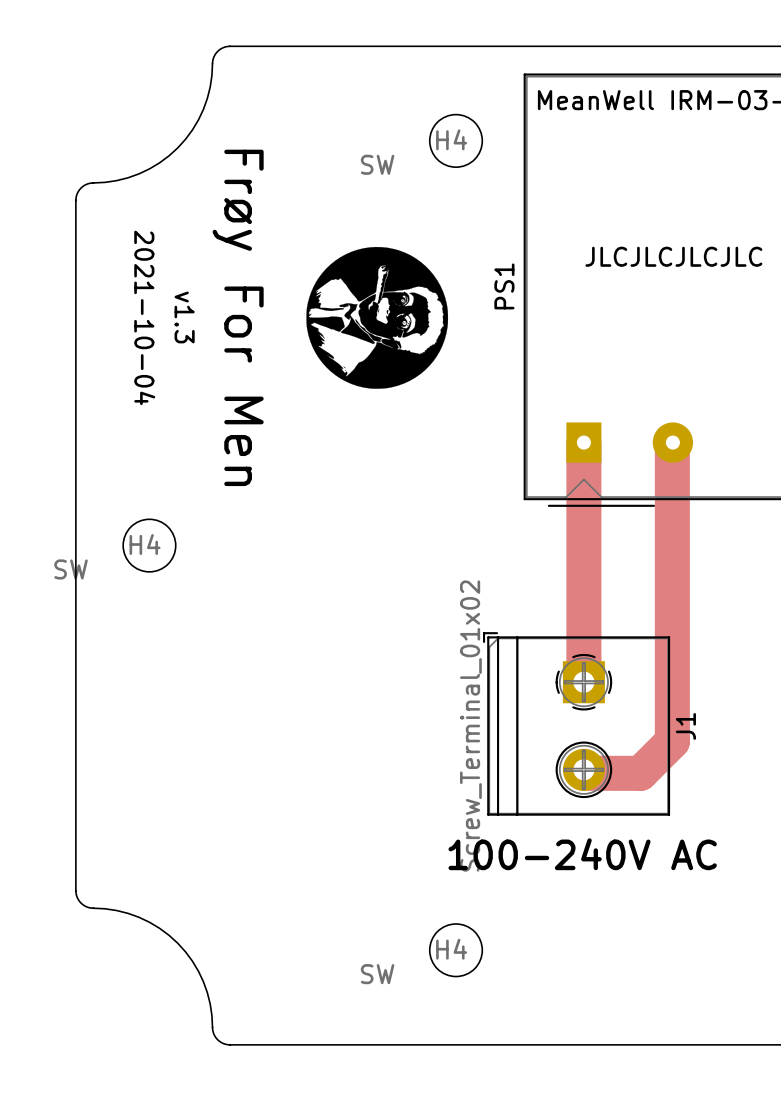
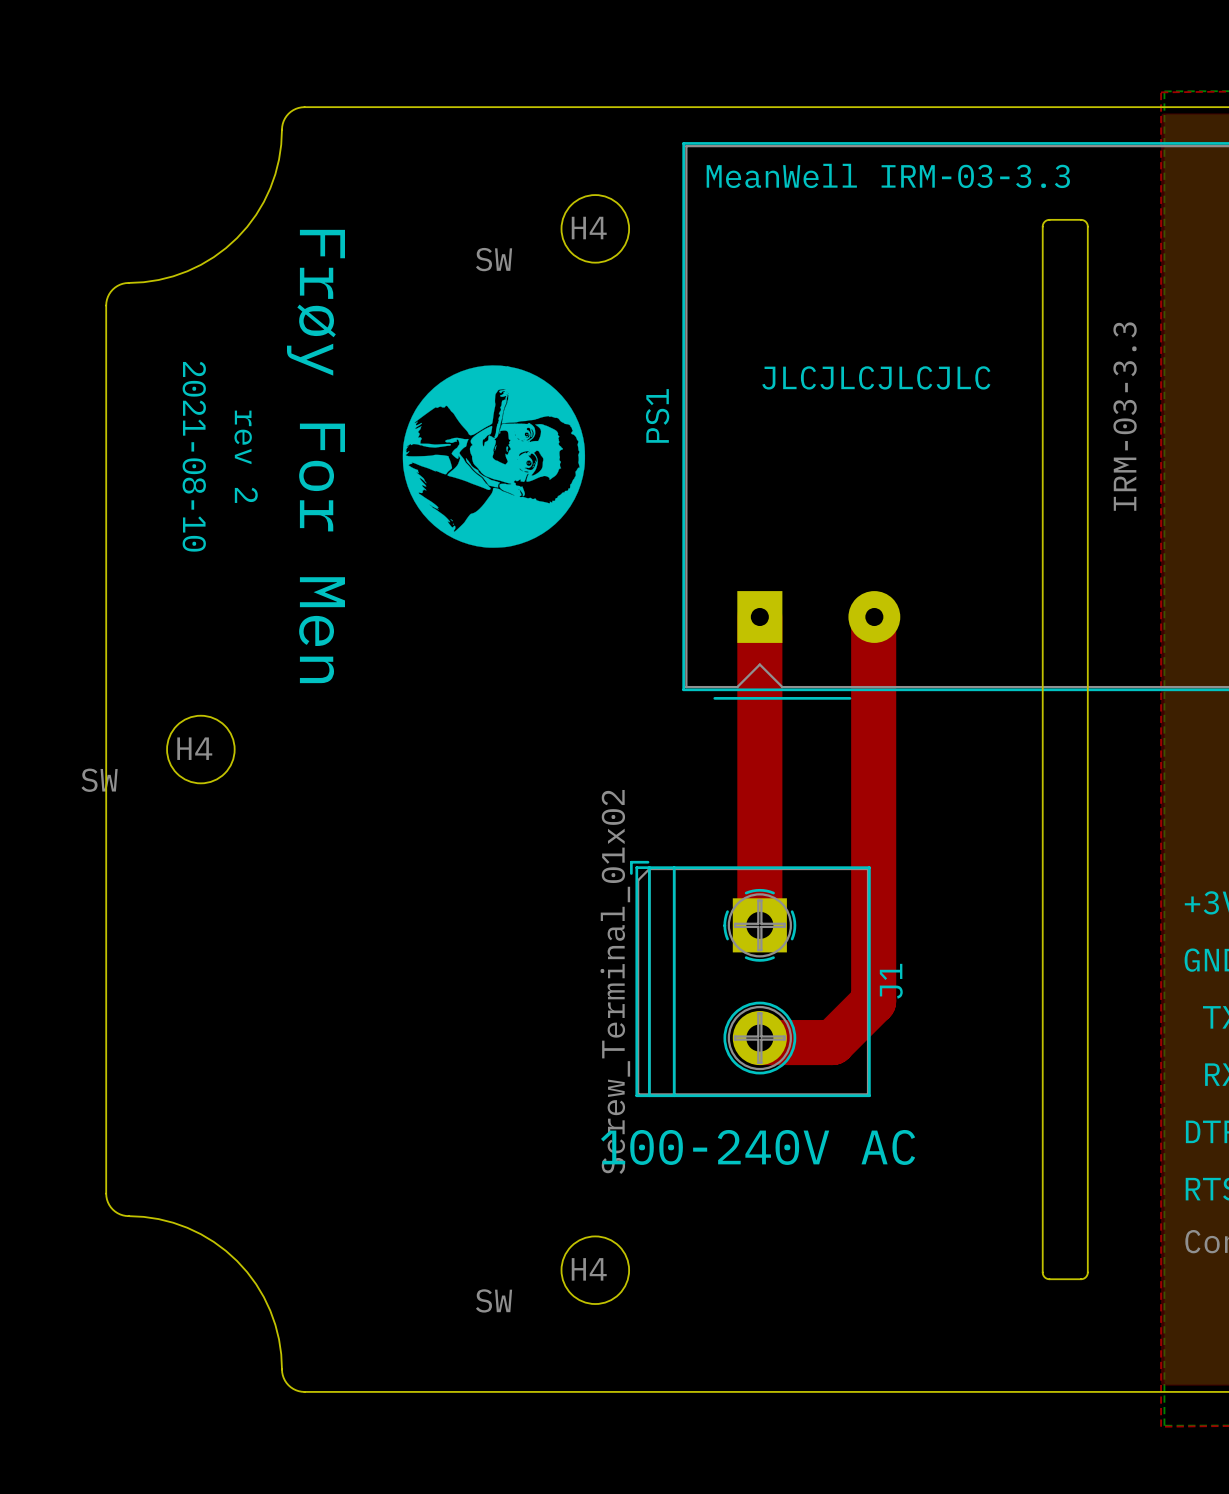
text: 2021-10-04 (144, 317) -> 2021-08-10 (194, 456)
text: v1.3 (184, 317) -> rev 2 (246, 456)

